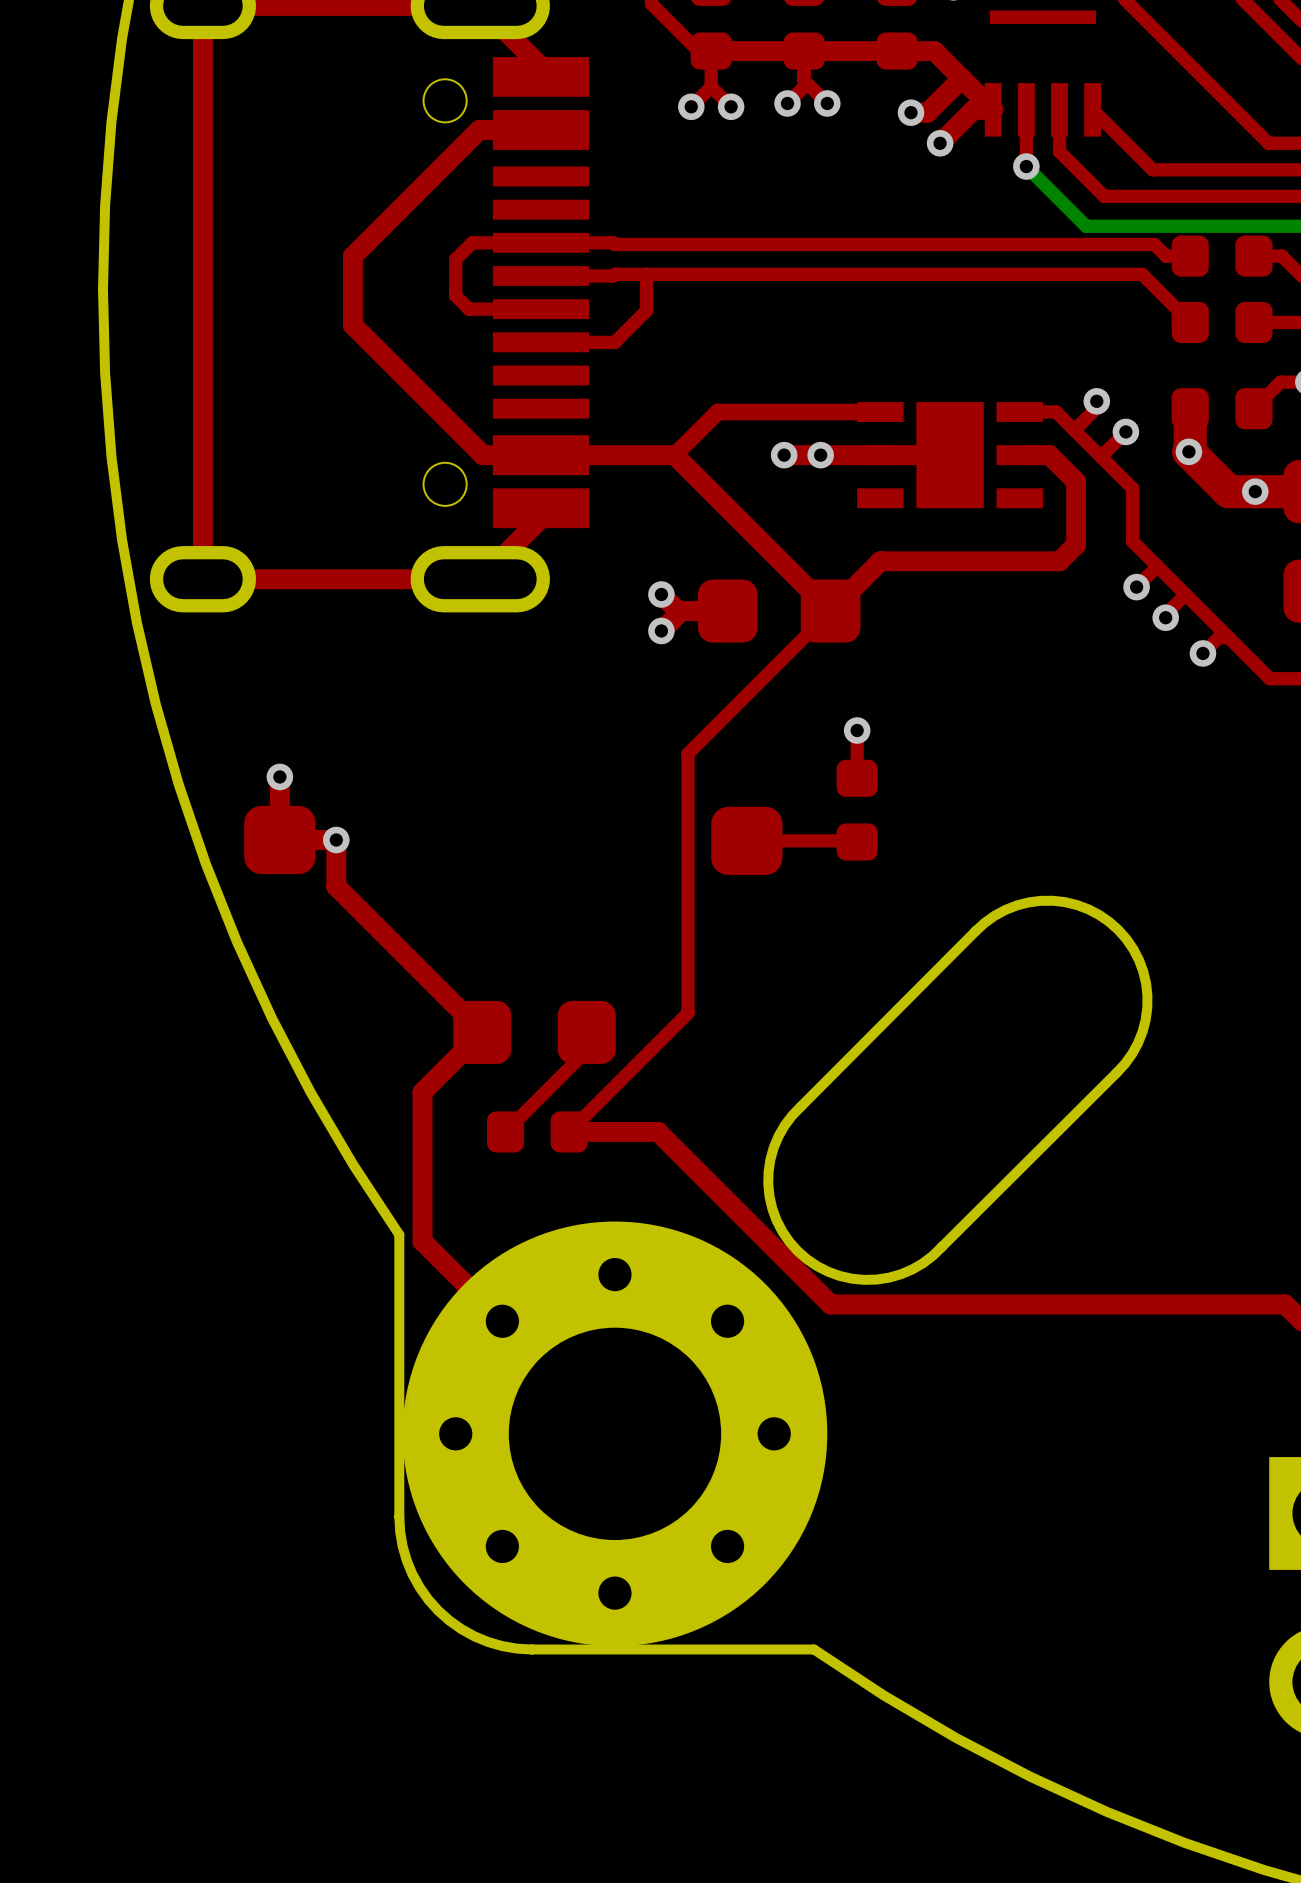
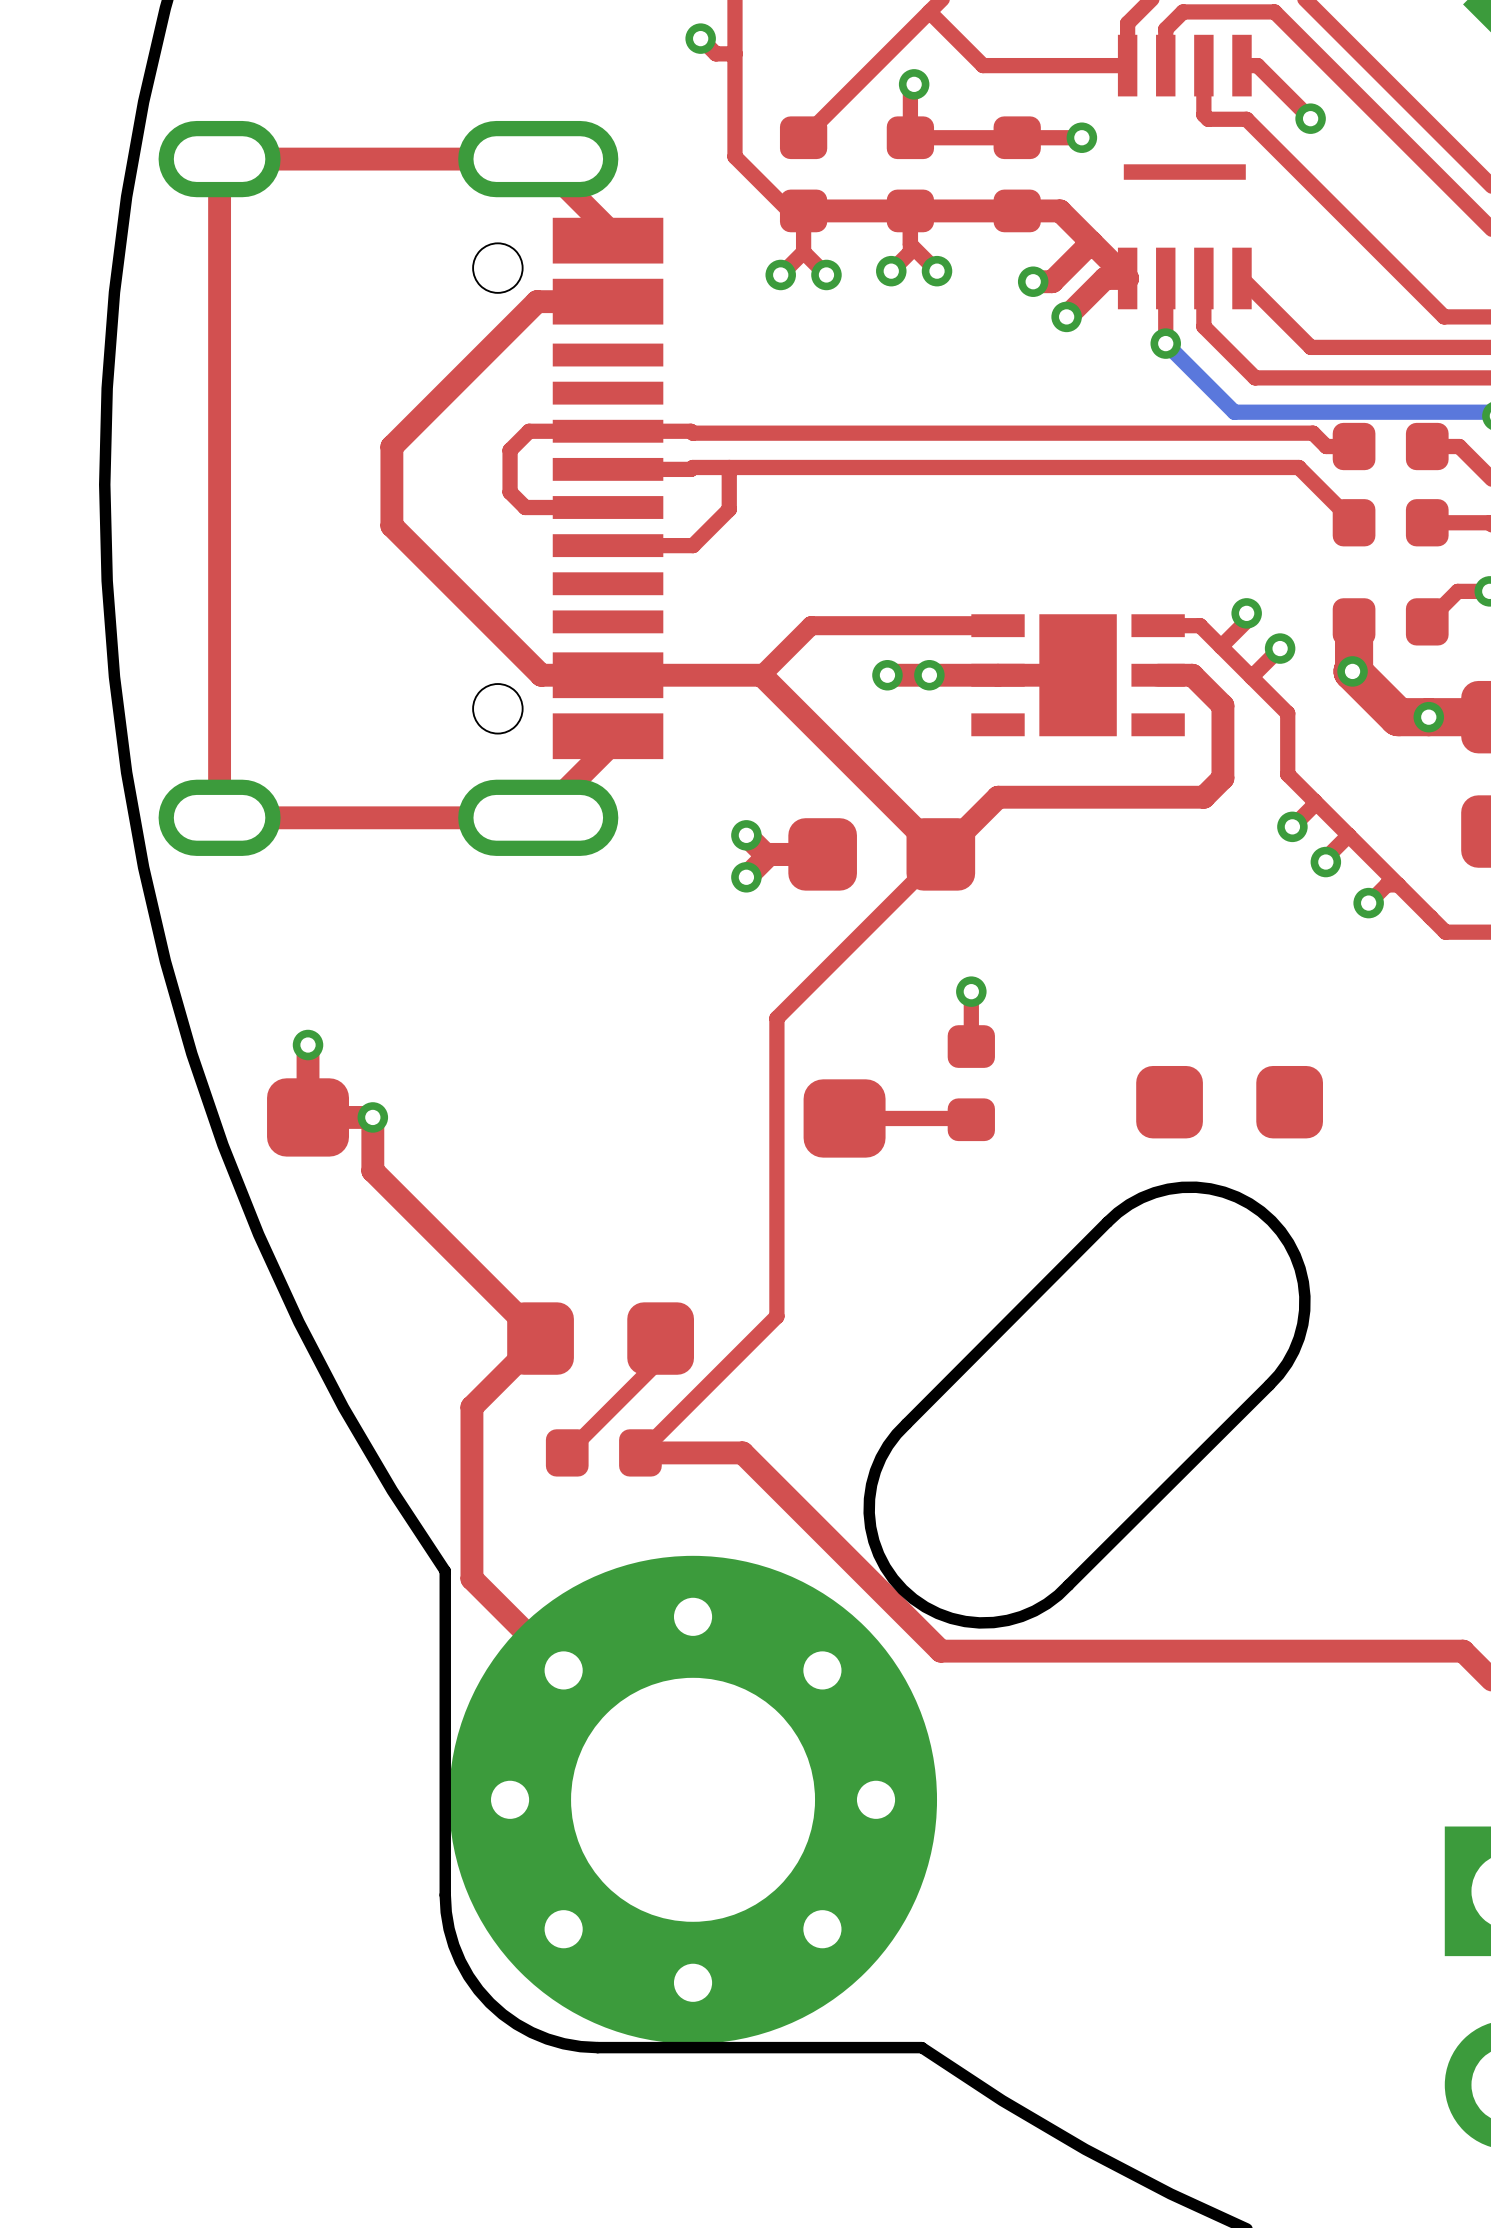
part: none -> (1229, 1102)

